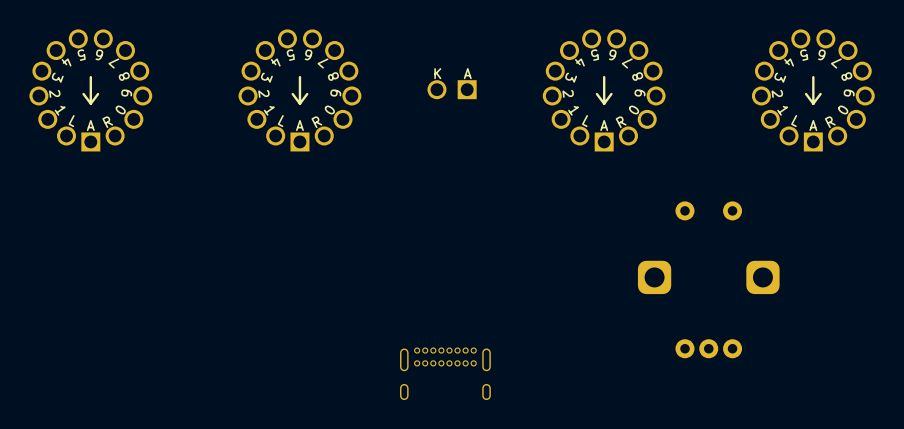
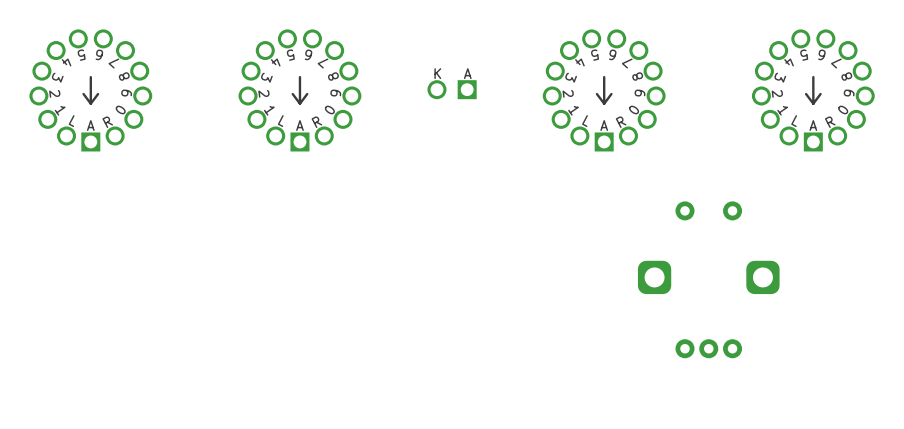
part: (445, 373) -> none

